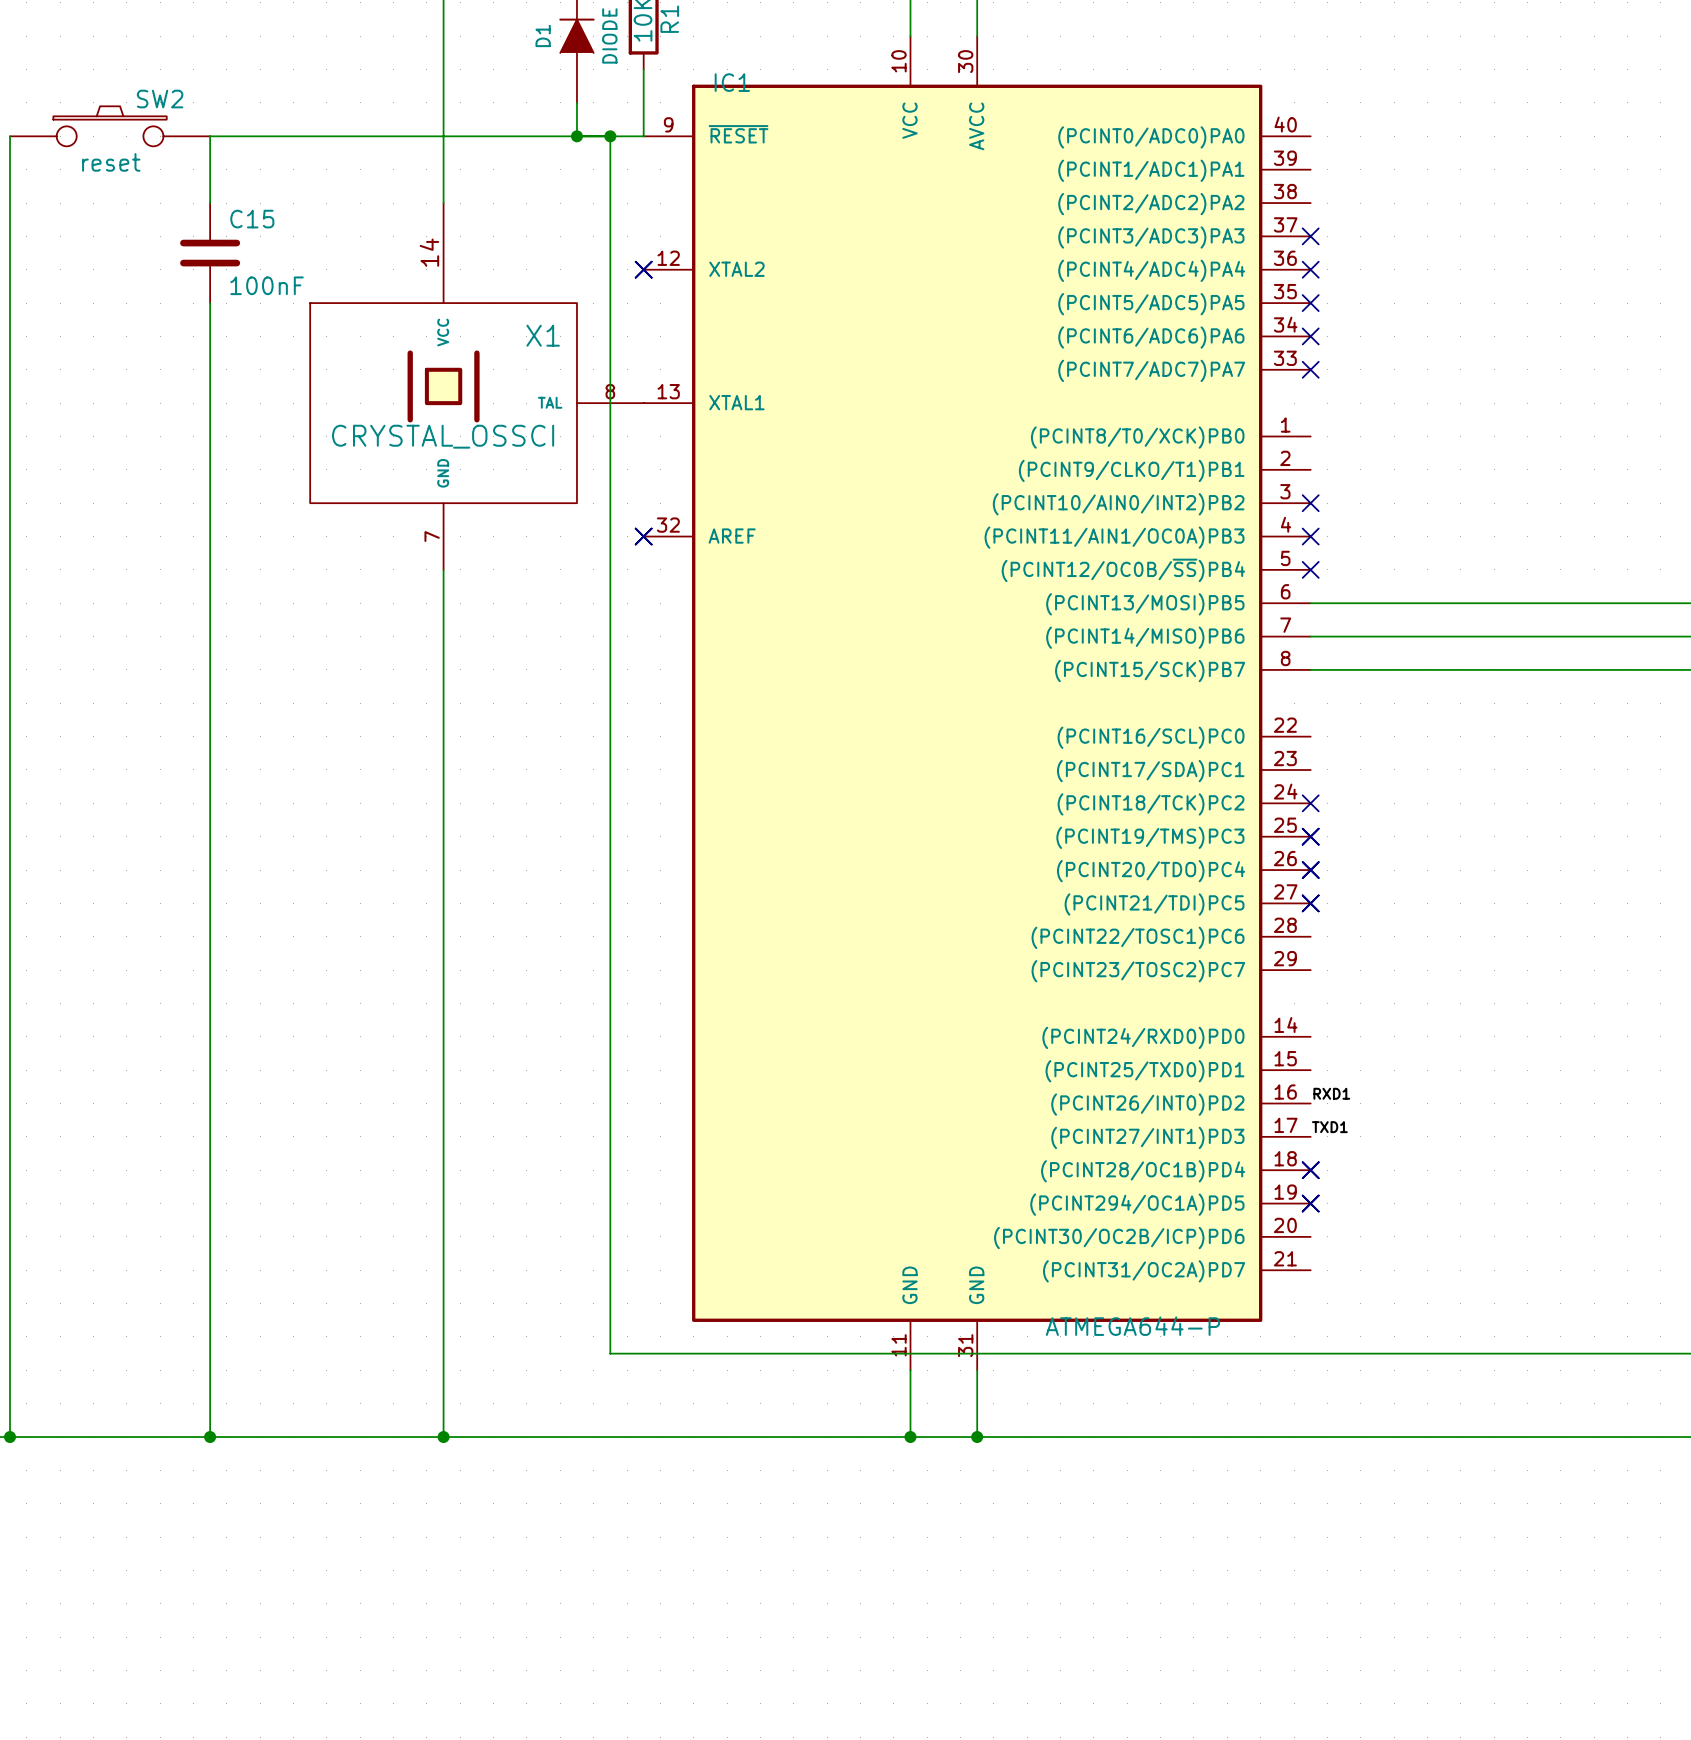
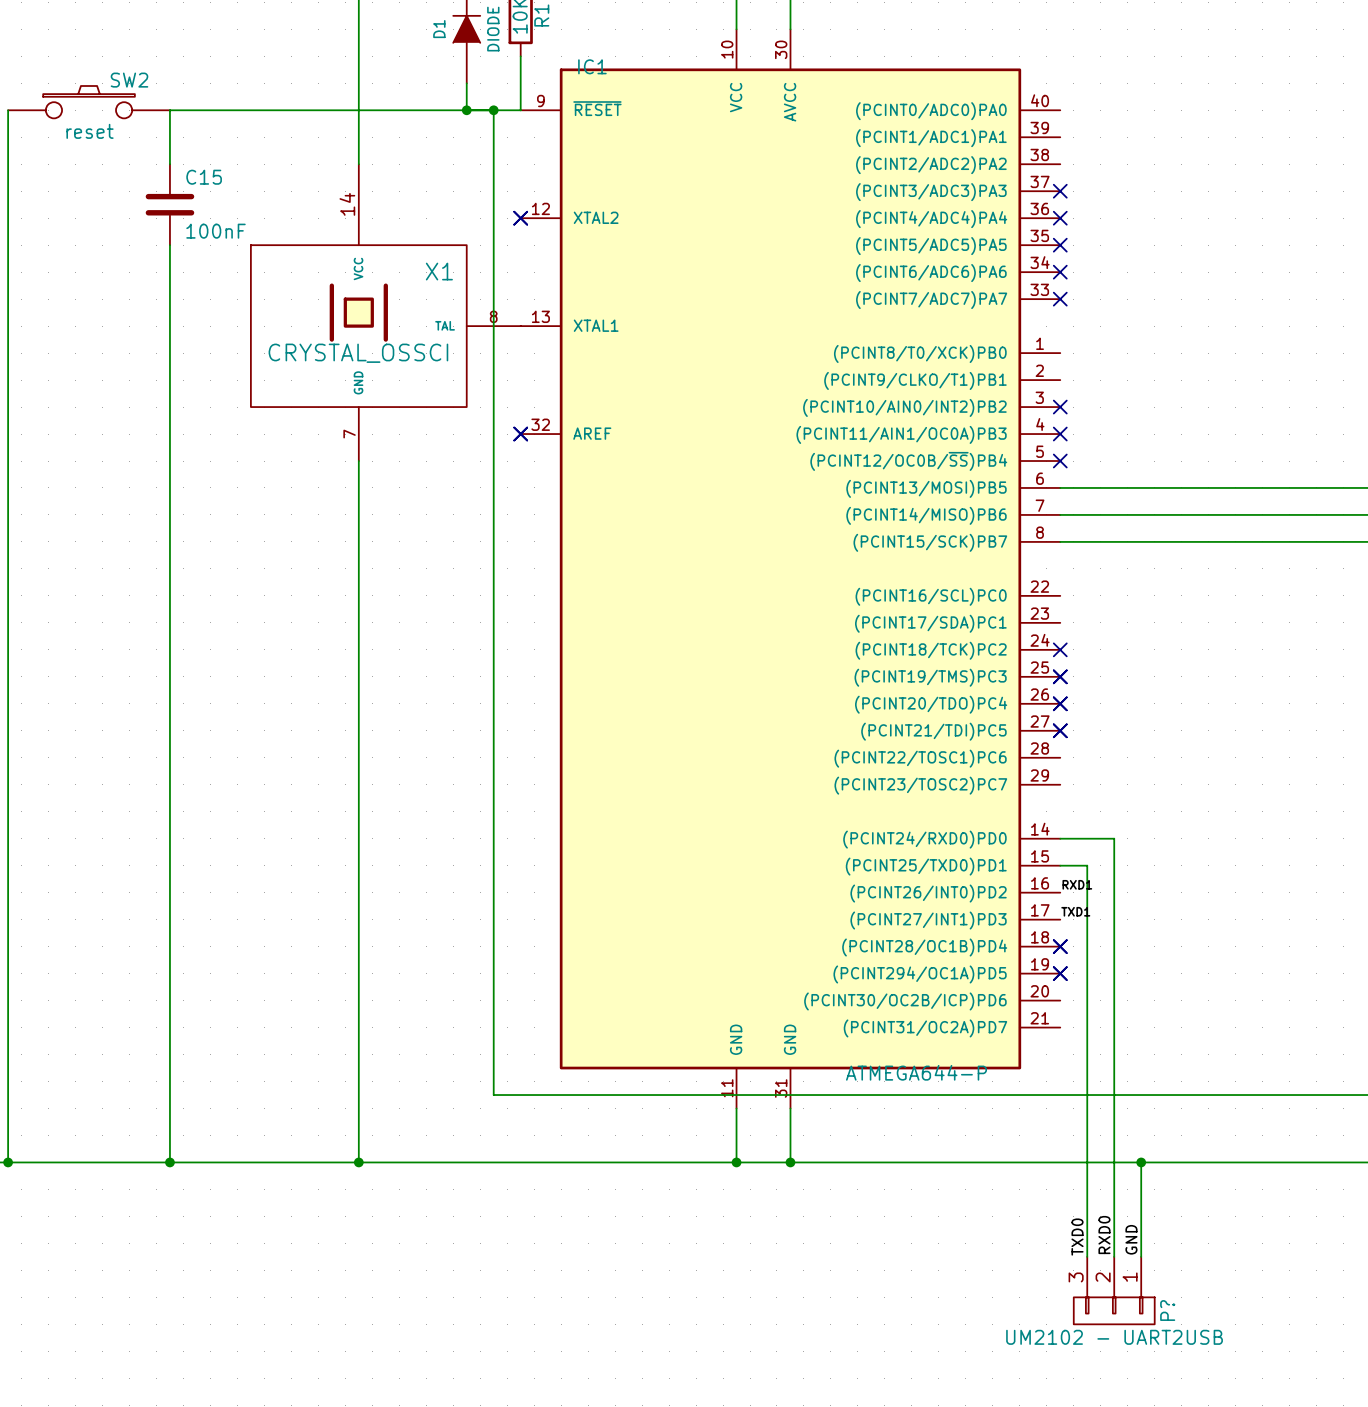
wire: none -> (1060, 838) (1114, 838) (1114, 1256)
wire: none -> (1060, 865) (1087, 865) (1087, 1256)
wire: none -> (1141, 1162) (1141, 1256)
junction: none -> (1141, 1162)
label: none -> RXD0 (1104, 1235)
label: none -> TXD0 (1077, 1237)
label: none -> GND (1131, 1239)
P?: none -> UM2102 - UART2USB (1114, 1290)

